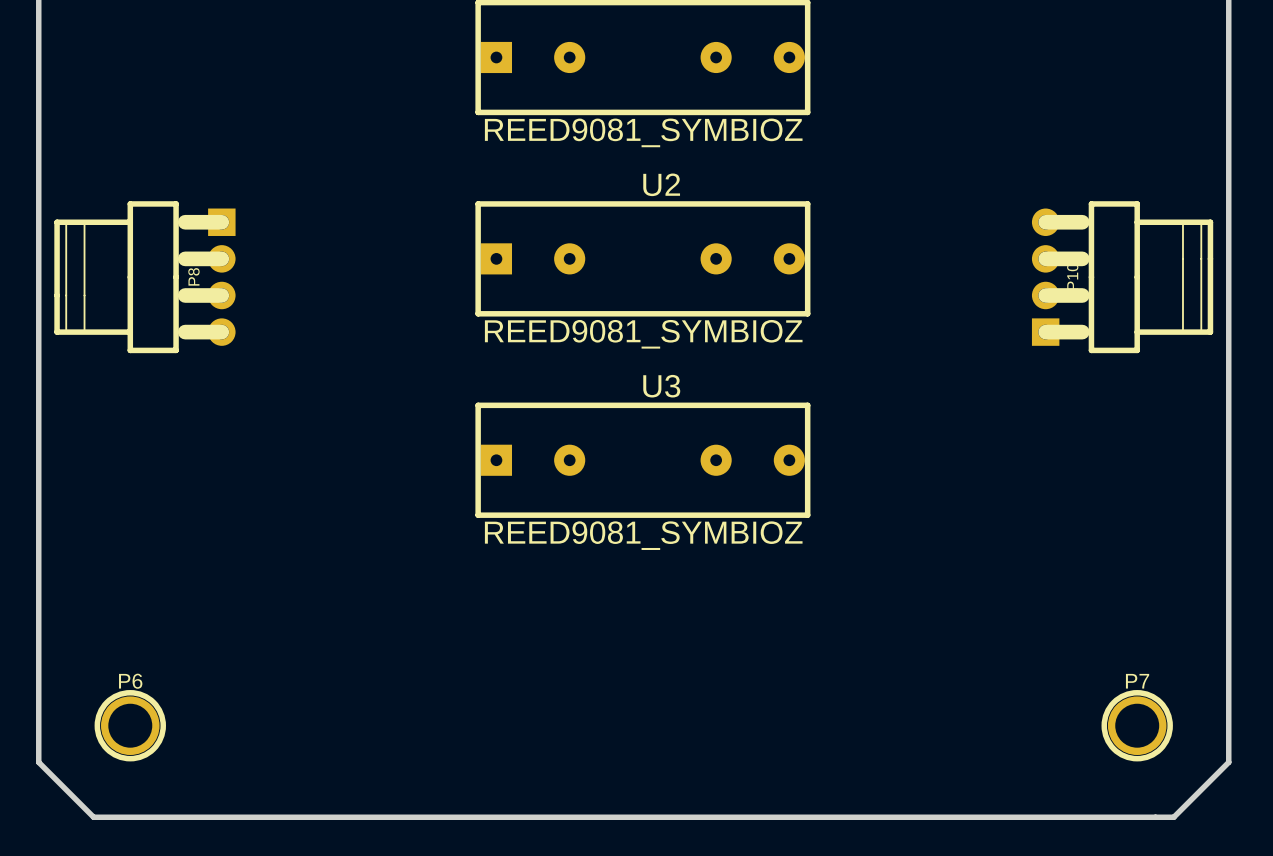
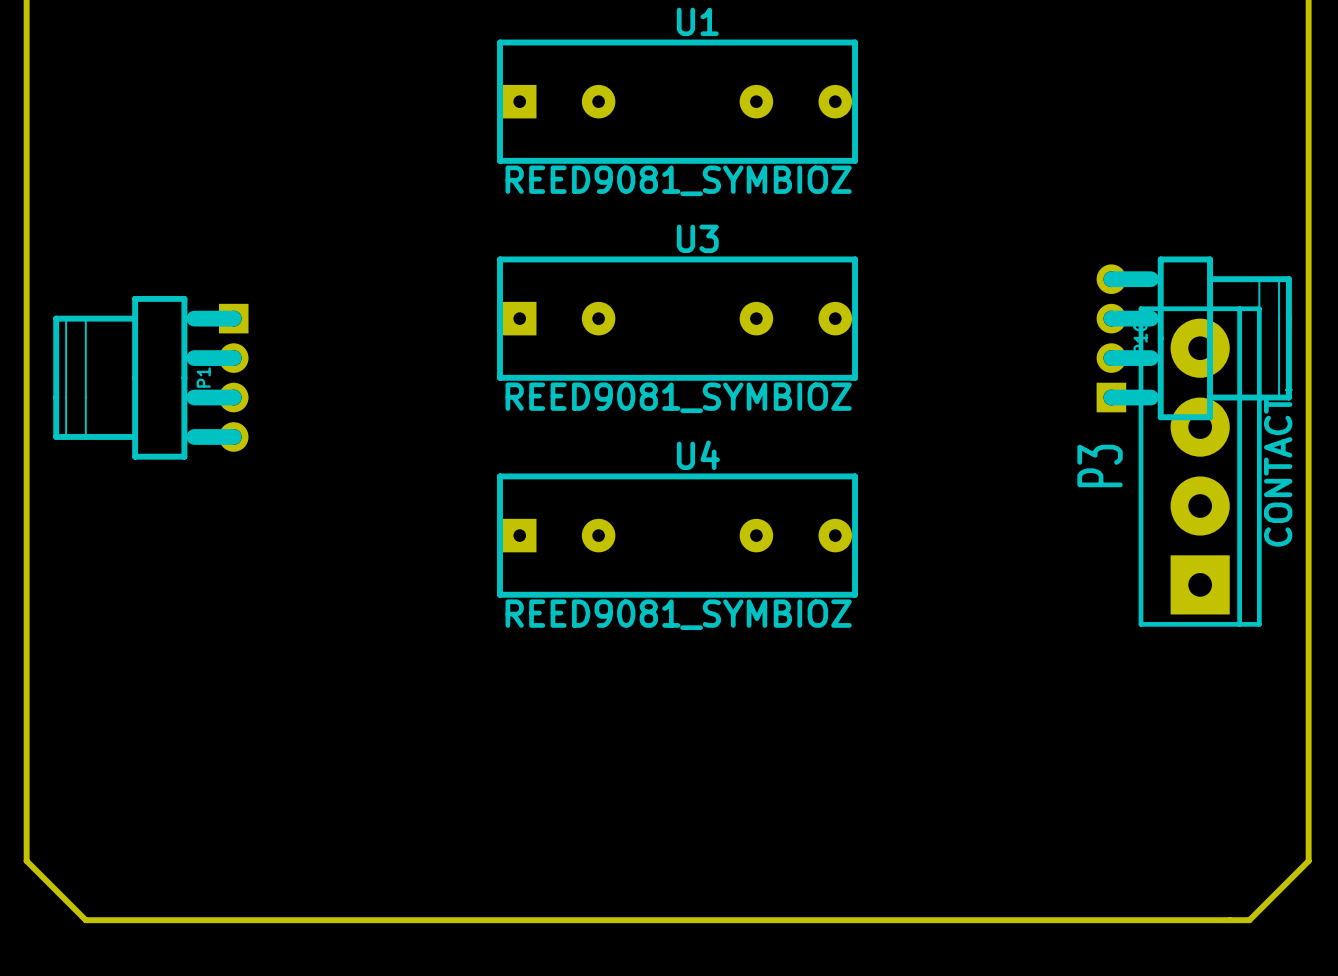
U2 name: U2 (661, 184) -> U3 (697, 238)
P8: (144, 277) -> none
P1: none -> (150, 377)
U3 name: U3 (661, 386) -> U4 (698, 455)
P3: none -> CONTACT. (1200, 466)
P6: (130, 725) -> none
P7: (1137, 725) -> none

